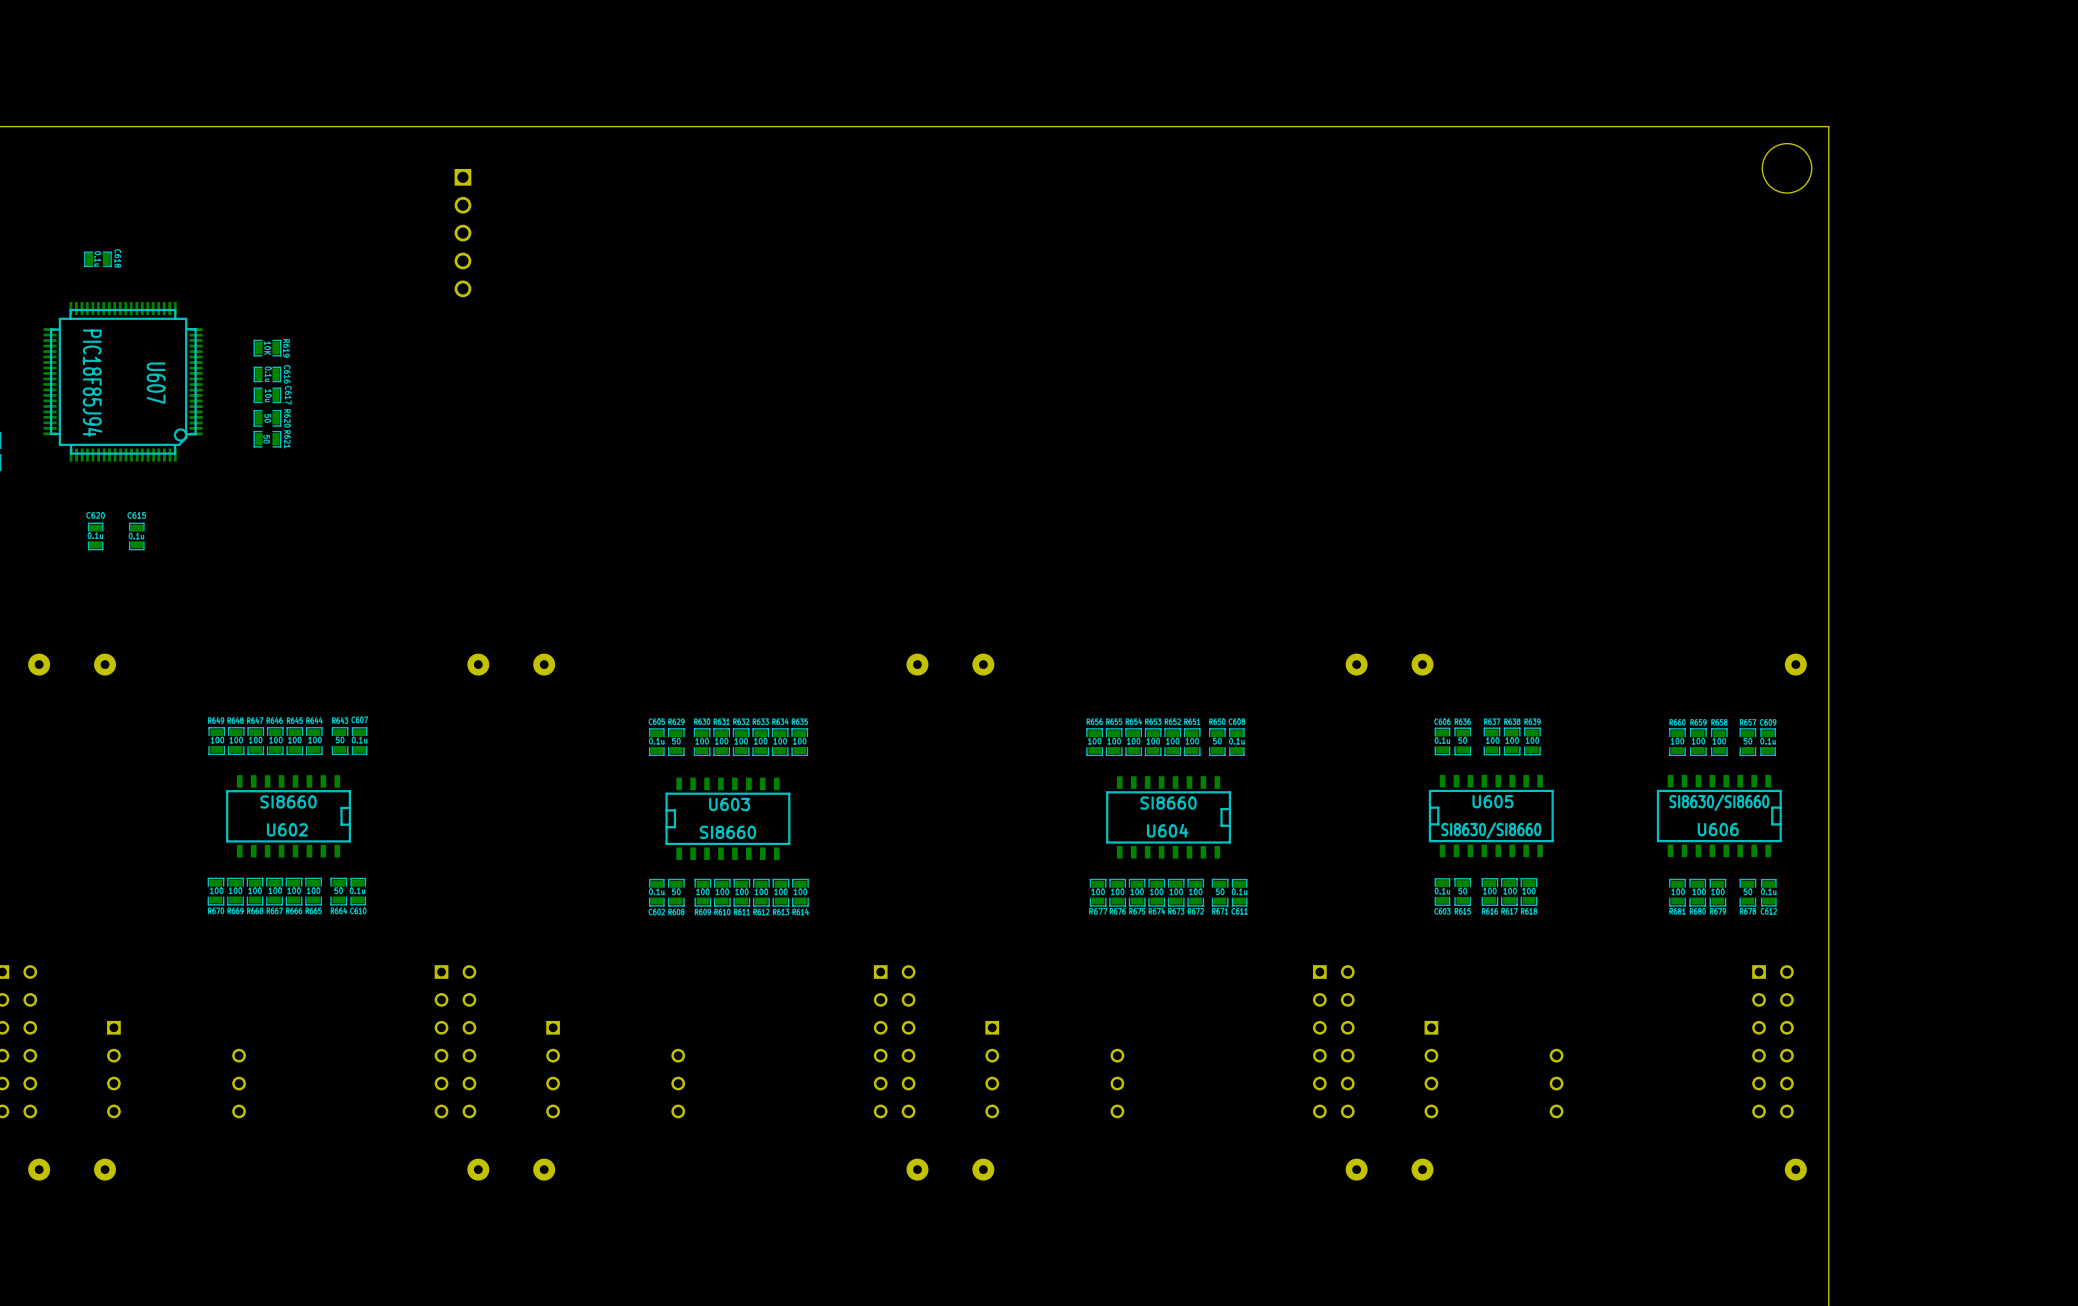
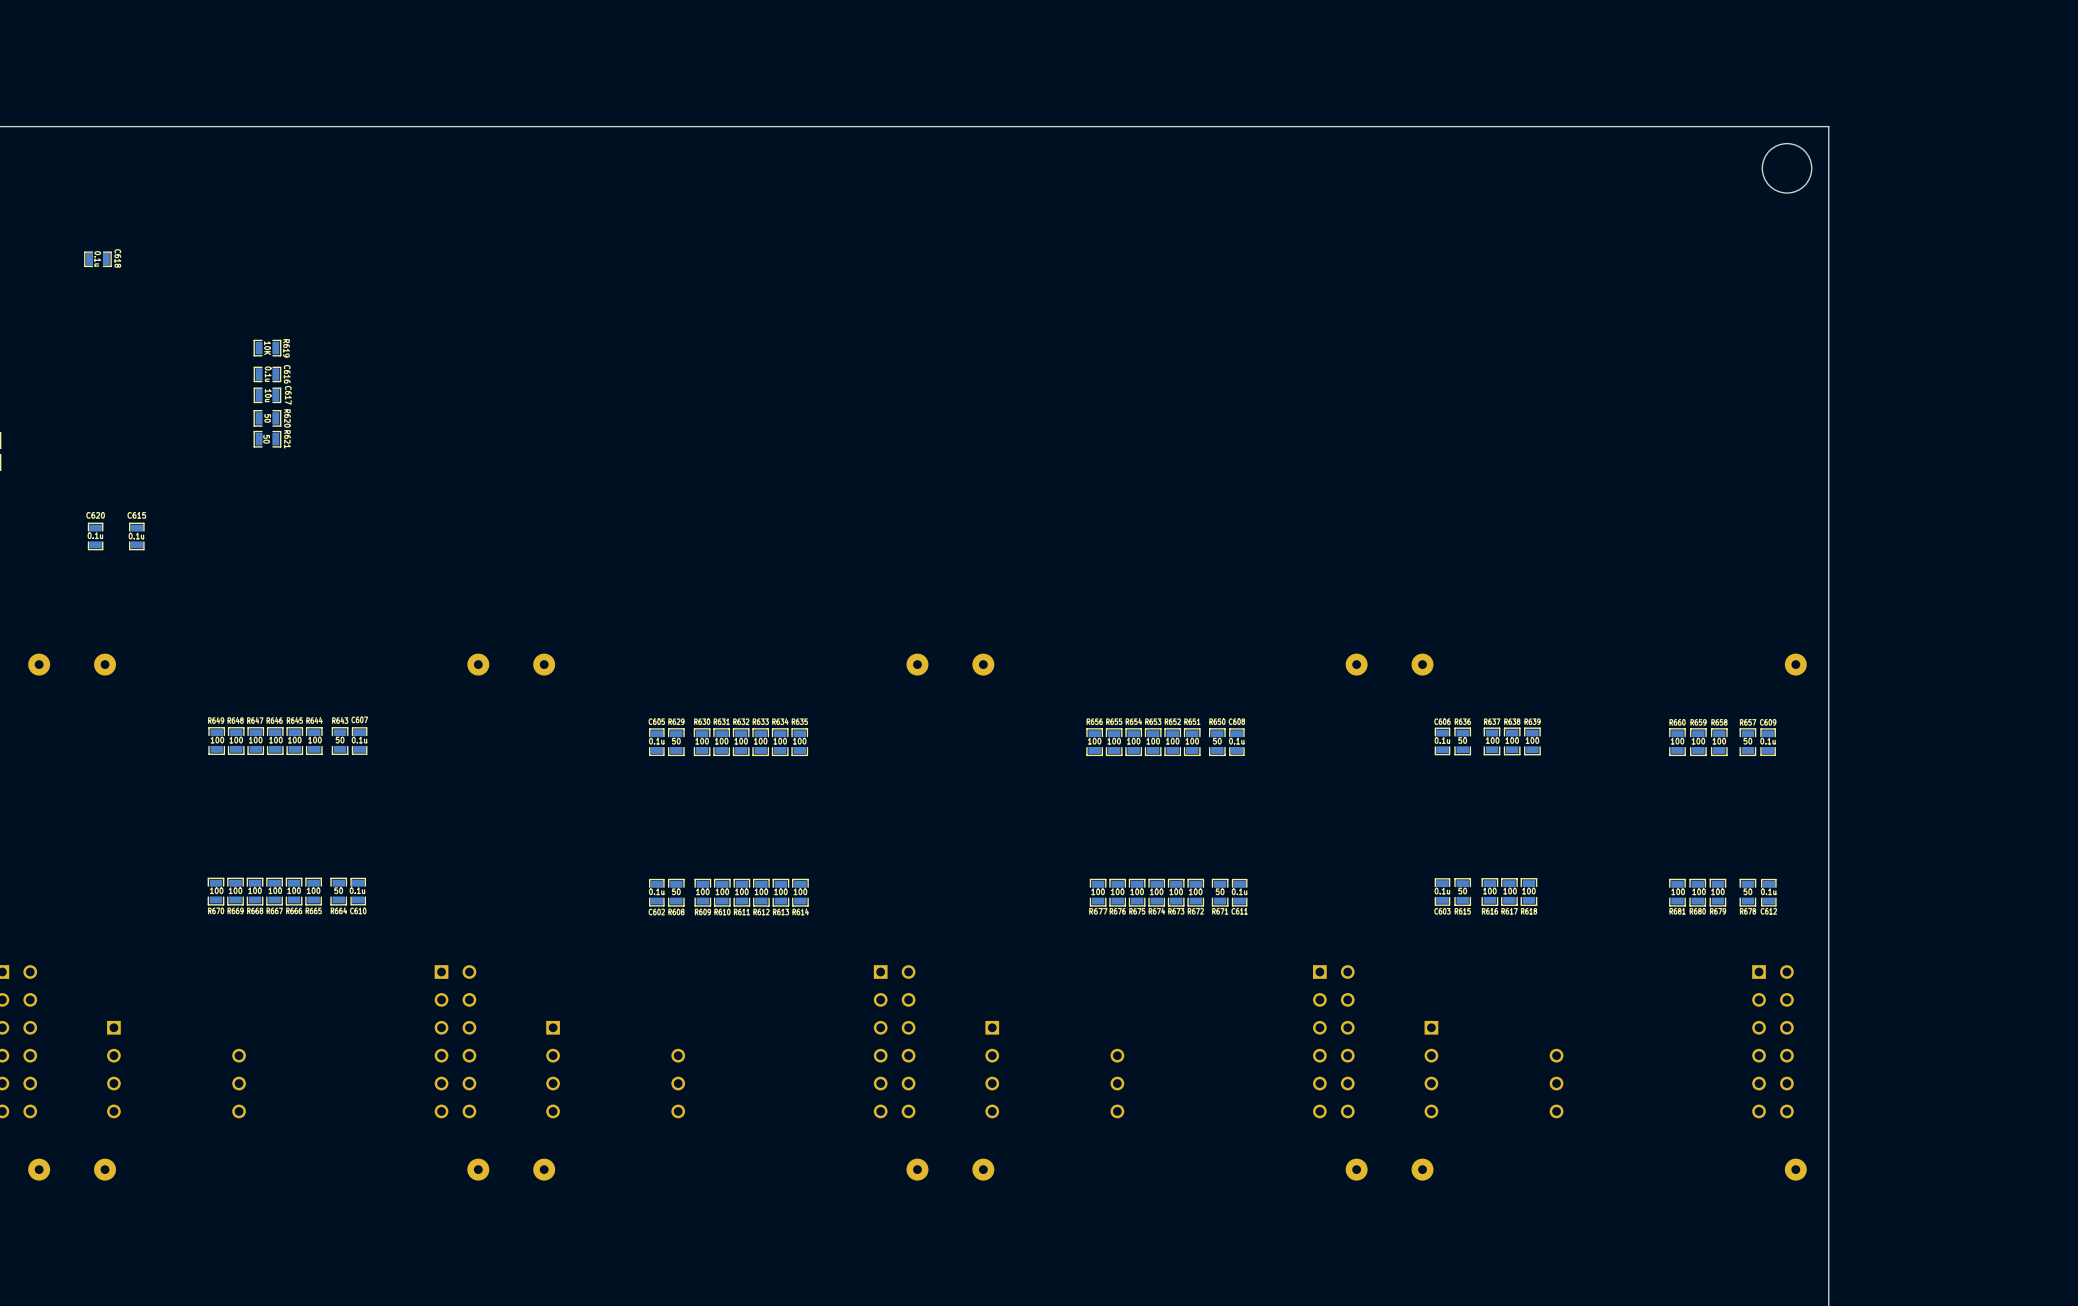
part: (462, 233) -> none
U607: PIC18F85J94 (123, 381) -> none
U602: SI8660 (288, 816) -> none
U605: SI8630/SI8660 (1491, 816) -> none
U606: SI8630/SI8660 (1719, 816) -> none
U604: SI8660 (1168, 817) -> none
U603: SI8660 (727, 818) -> none

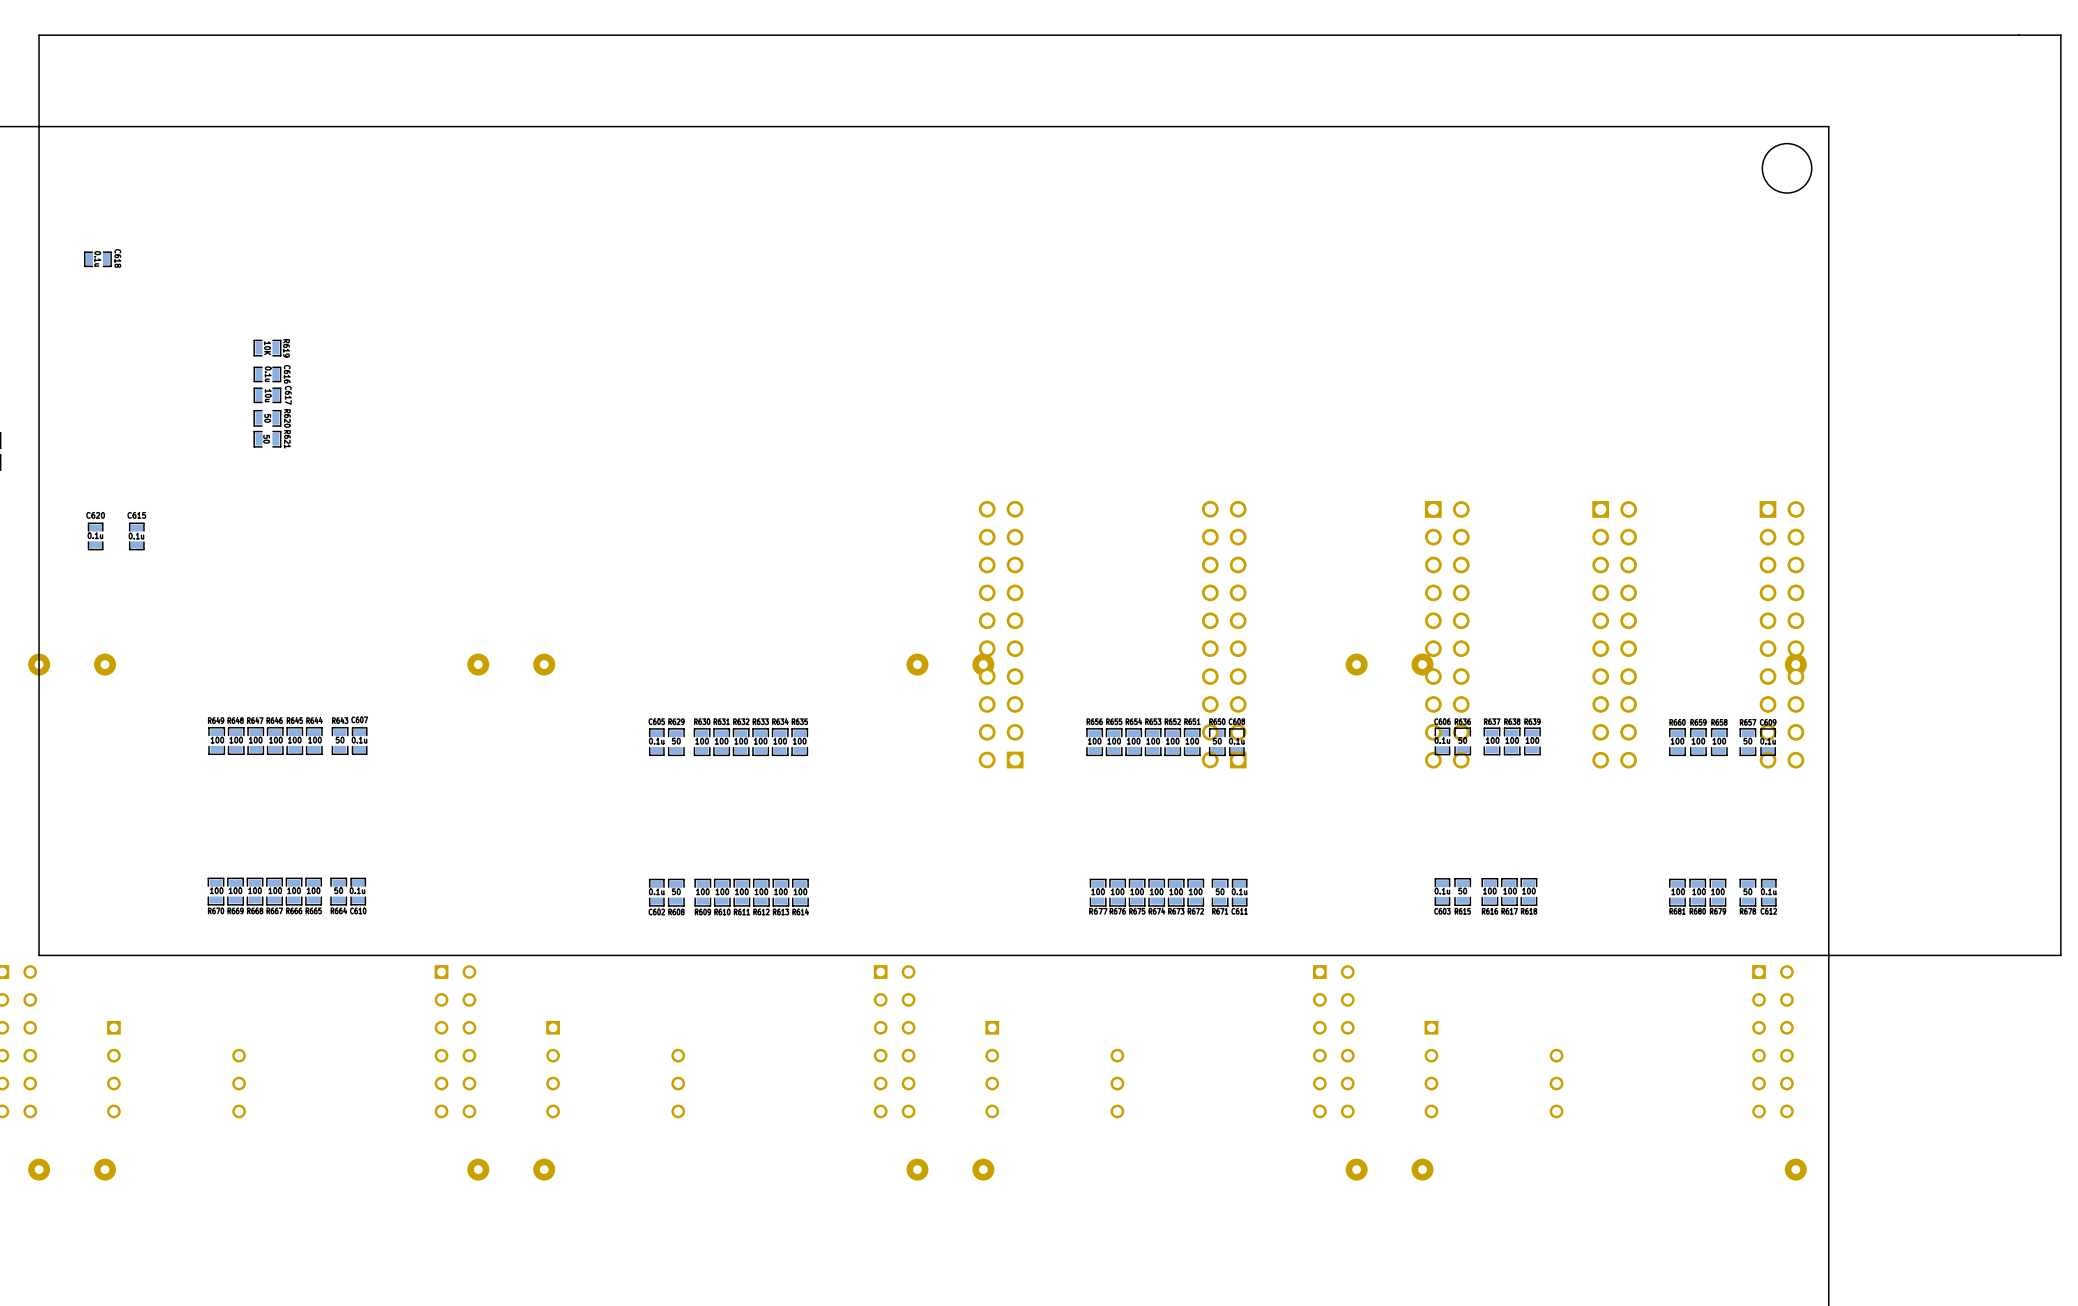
board edge: none -> (2060, 35) (39, 35) (39, 955) (2060, 955) (2060, 35)
part: none -> (1001, 634)
part: none -> (1224, 634)
part: none -> (1447, 634)
part: none -> (1614, 634)
part: none -> (1781, 634)

